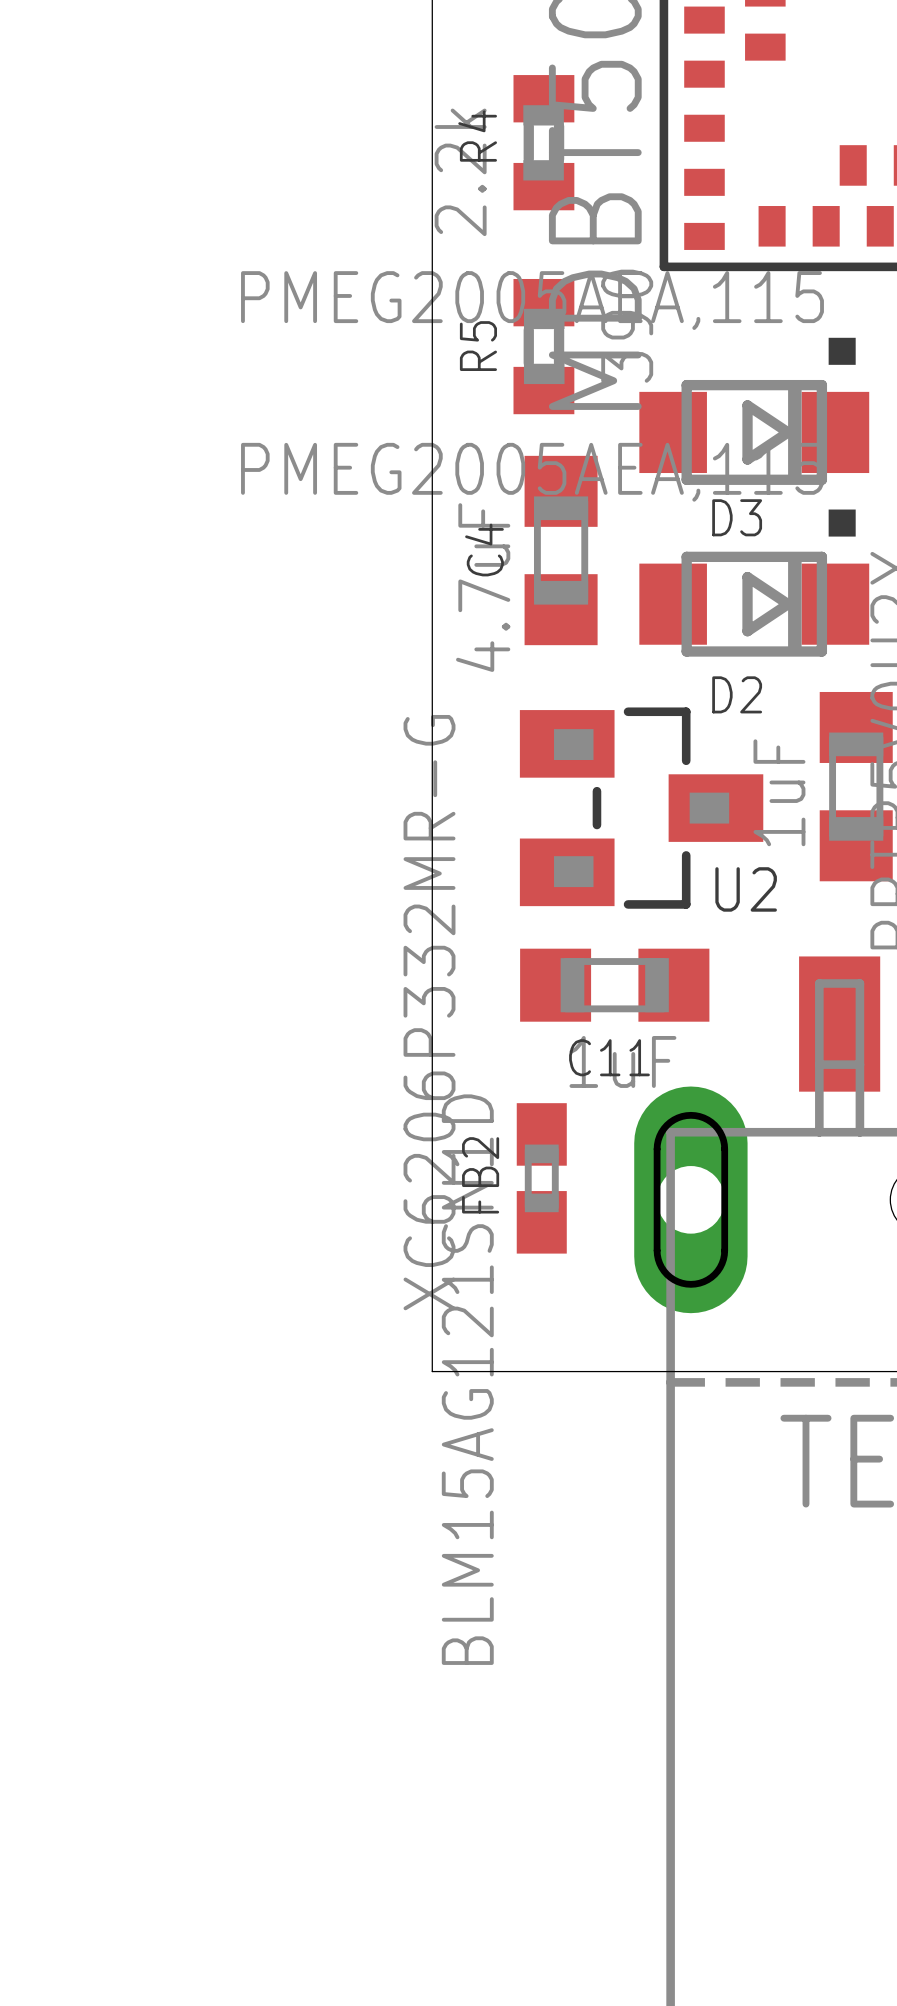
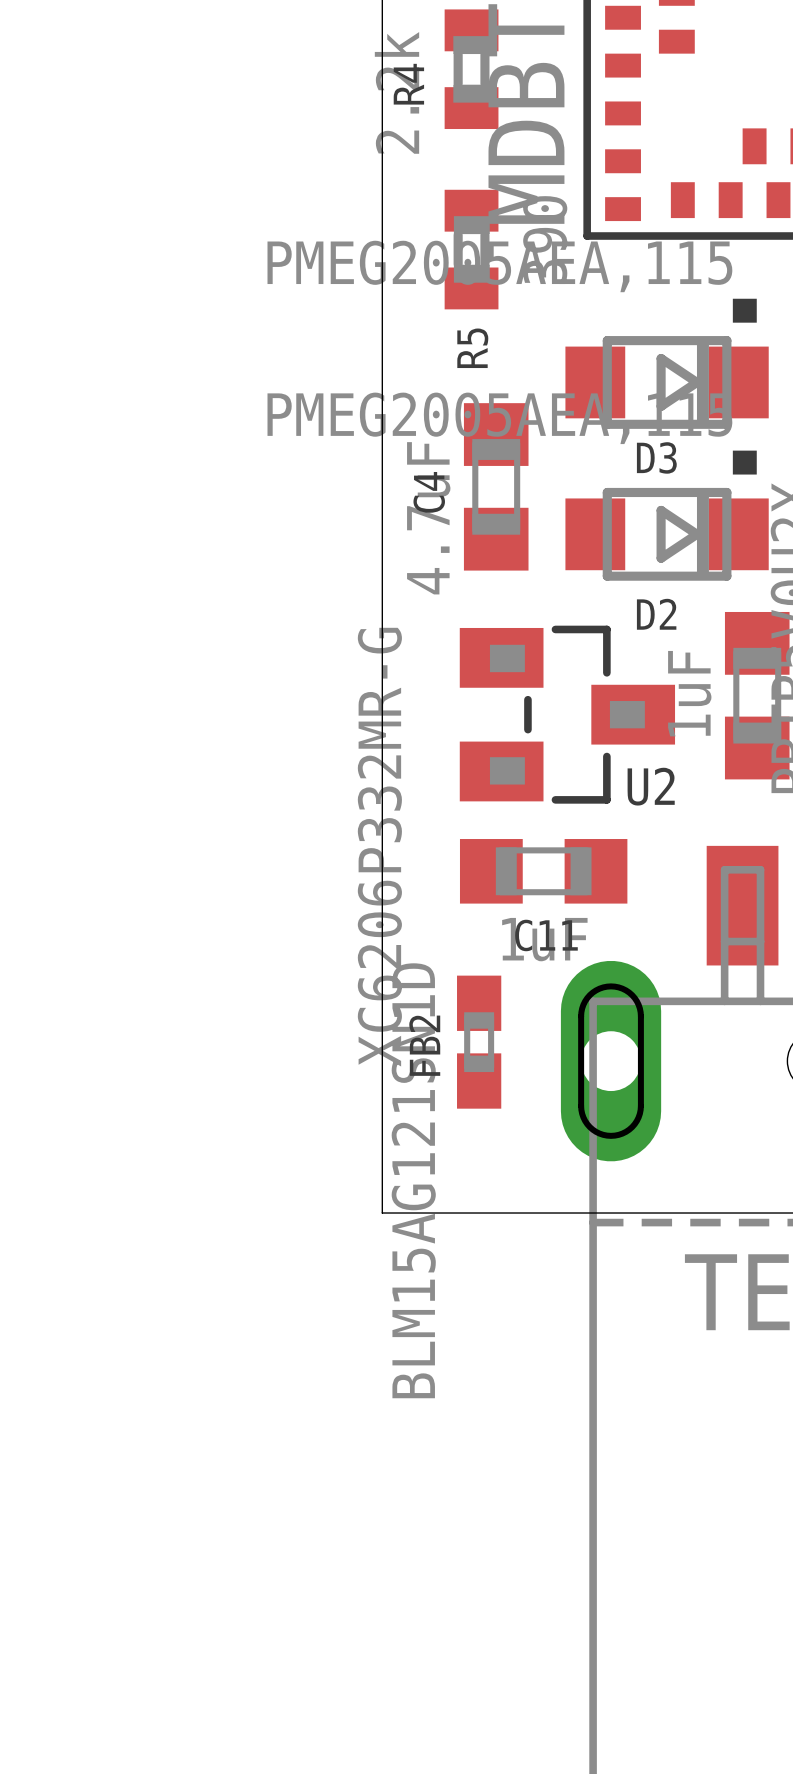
R4 name position: R4 (477, 136) -> R4 (408, 84)
R4 position: (543, 142) -> (471, 69)
R5 name position: R5 (478, 346) -> R5 (472, 348)
R5 position: (543, 346) -> (471, 249)

